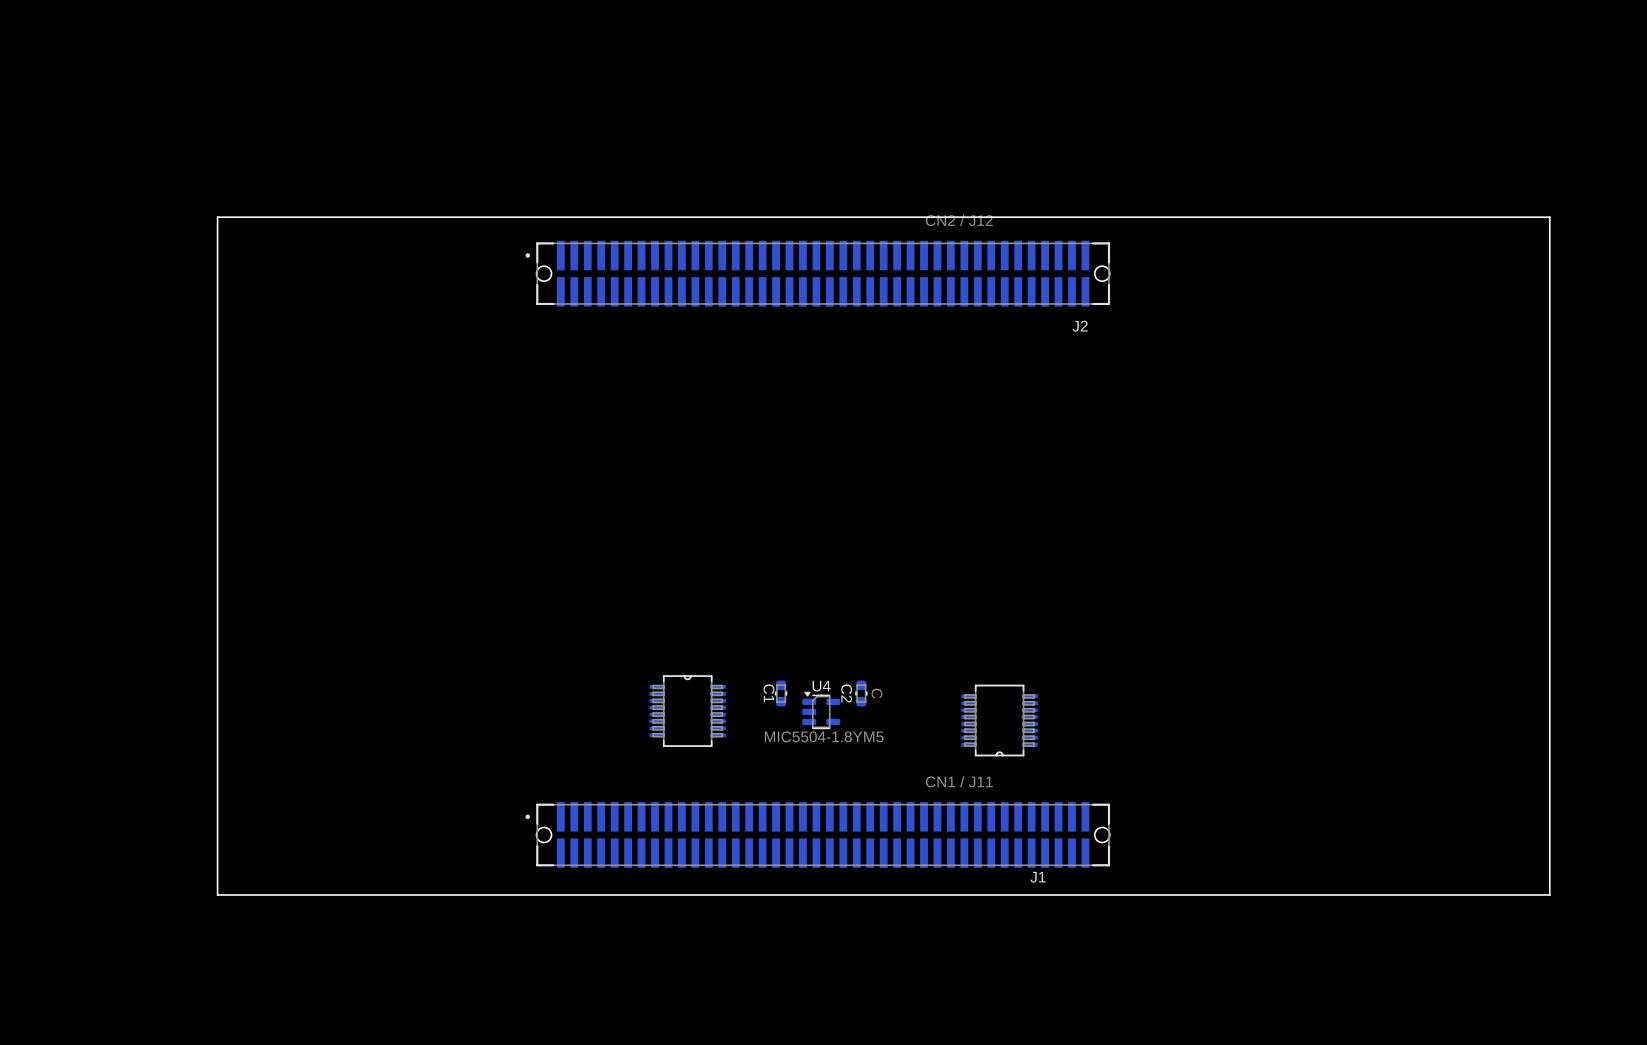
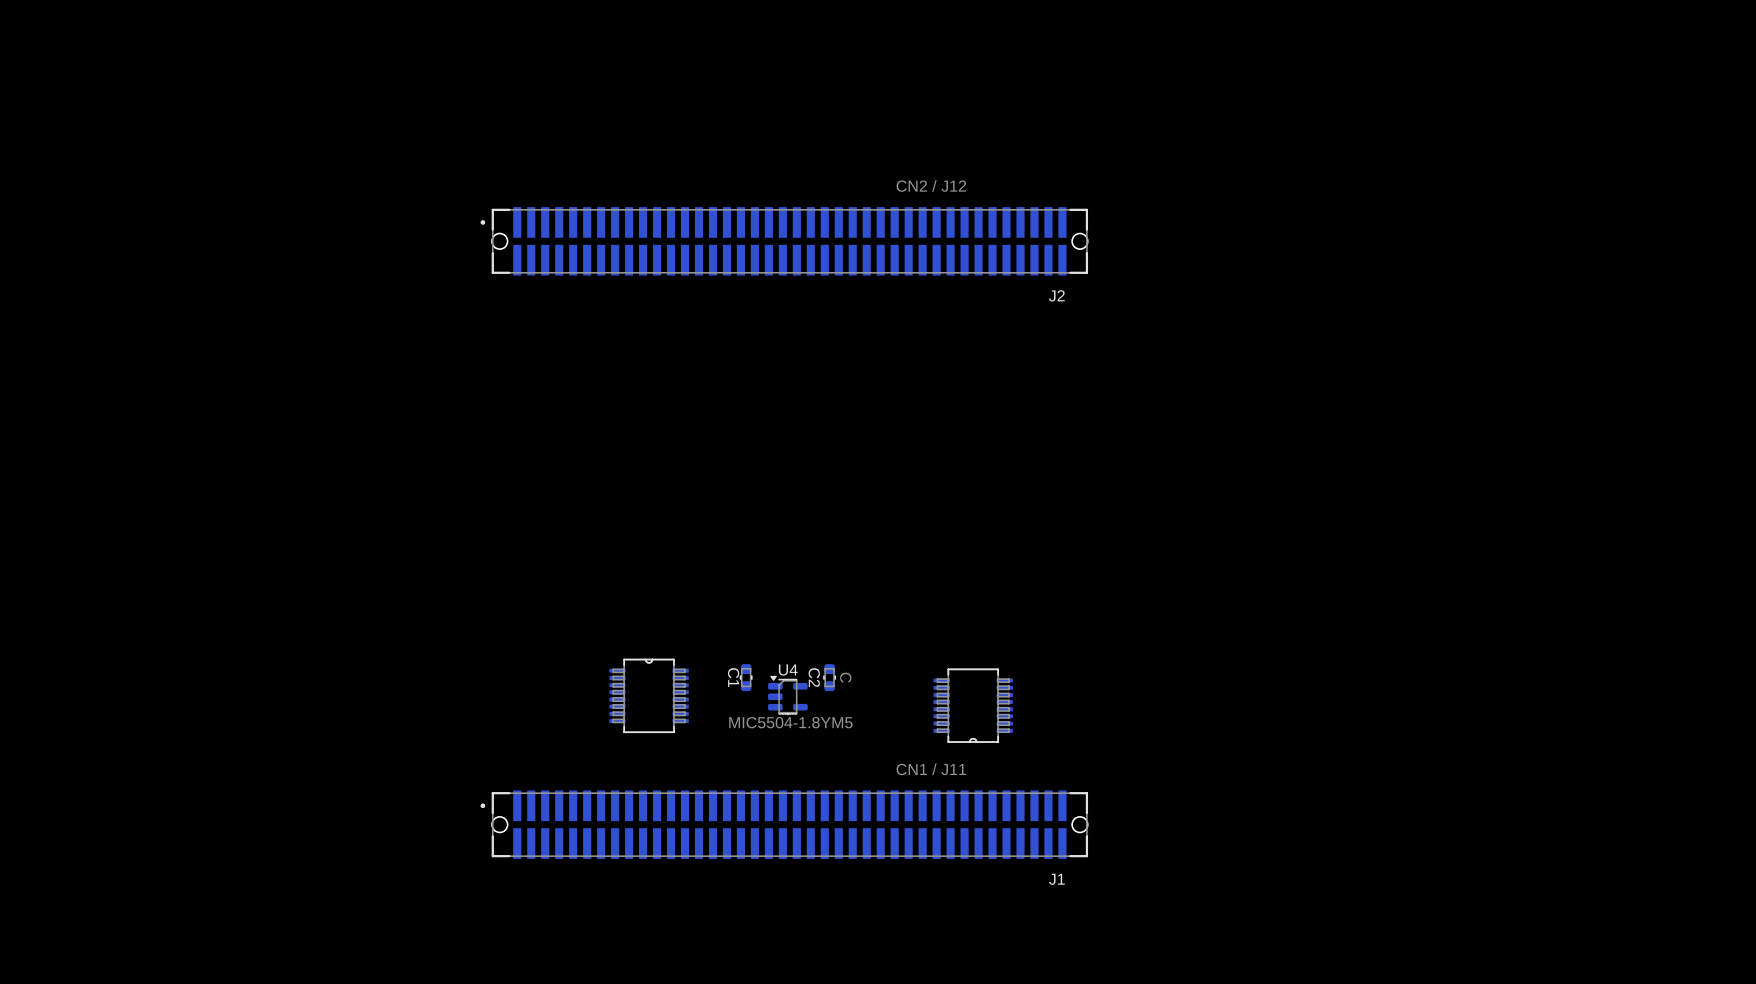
board edge: (1549, 217) (217, 217) (217, 894) (1549, 894) (1549, 217) -> none
J1 name position: J1 (1037, 877) -> J1 (1056, 879)

